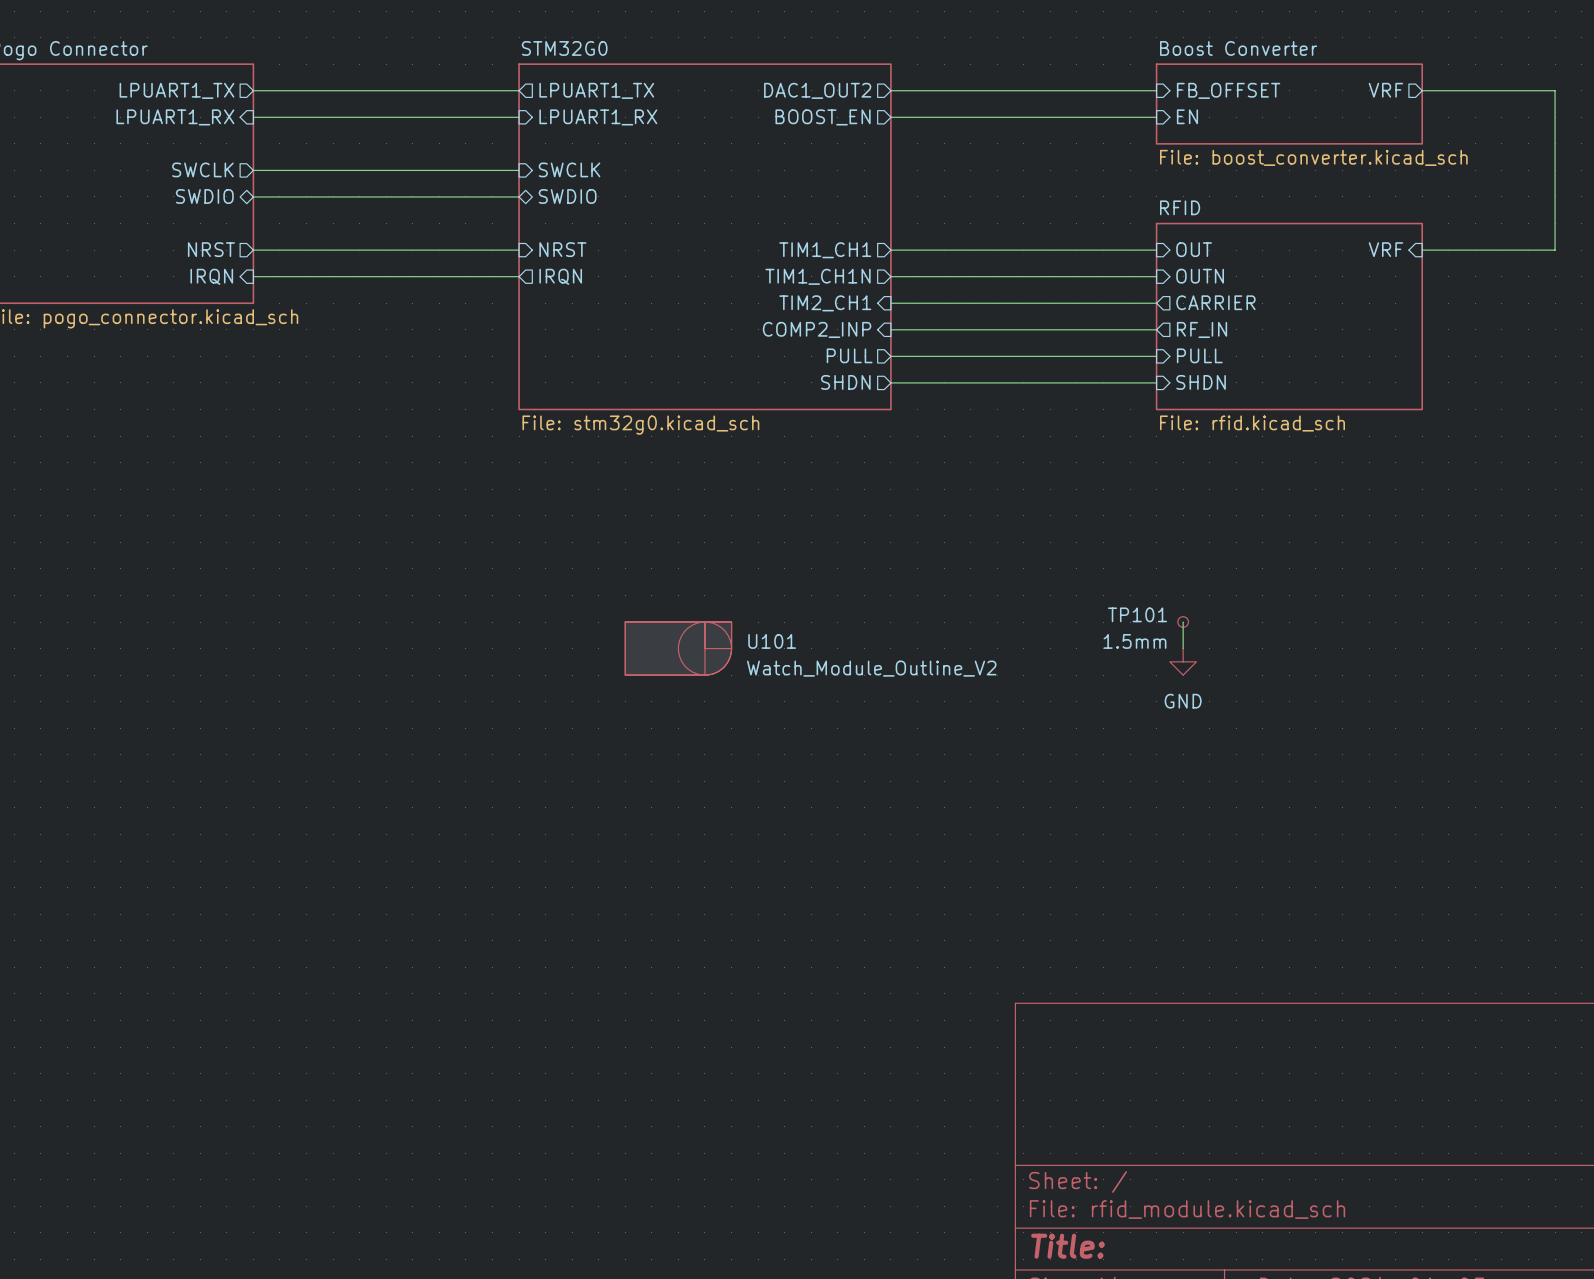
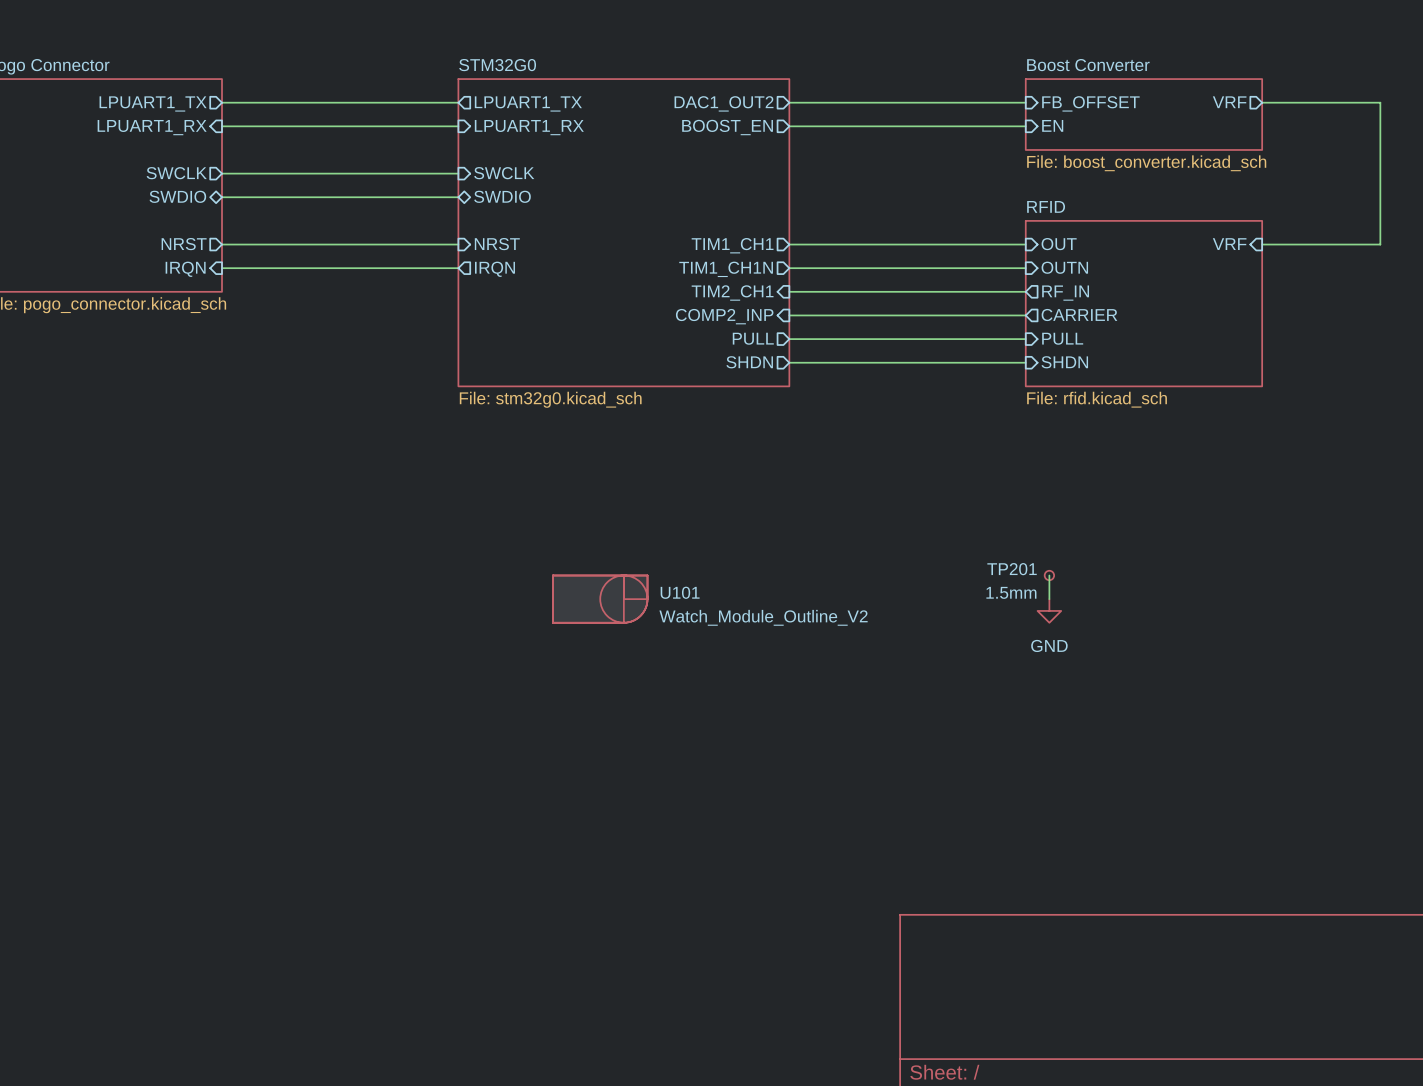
sheet pin: CARRIER (1215, 302) -> RF_IN (1065, 293)
sheet pin: RF_IN (1202, 329) -> CARRIER (1079, 315)
TP101 name: TP101 (1137, 614) -> TP201 (1012, 569)

